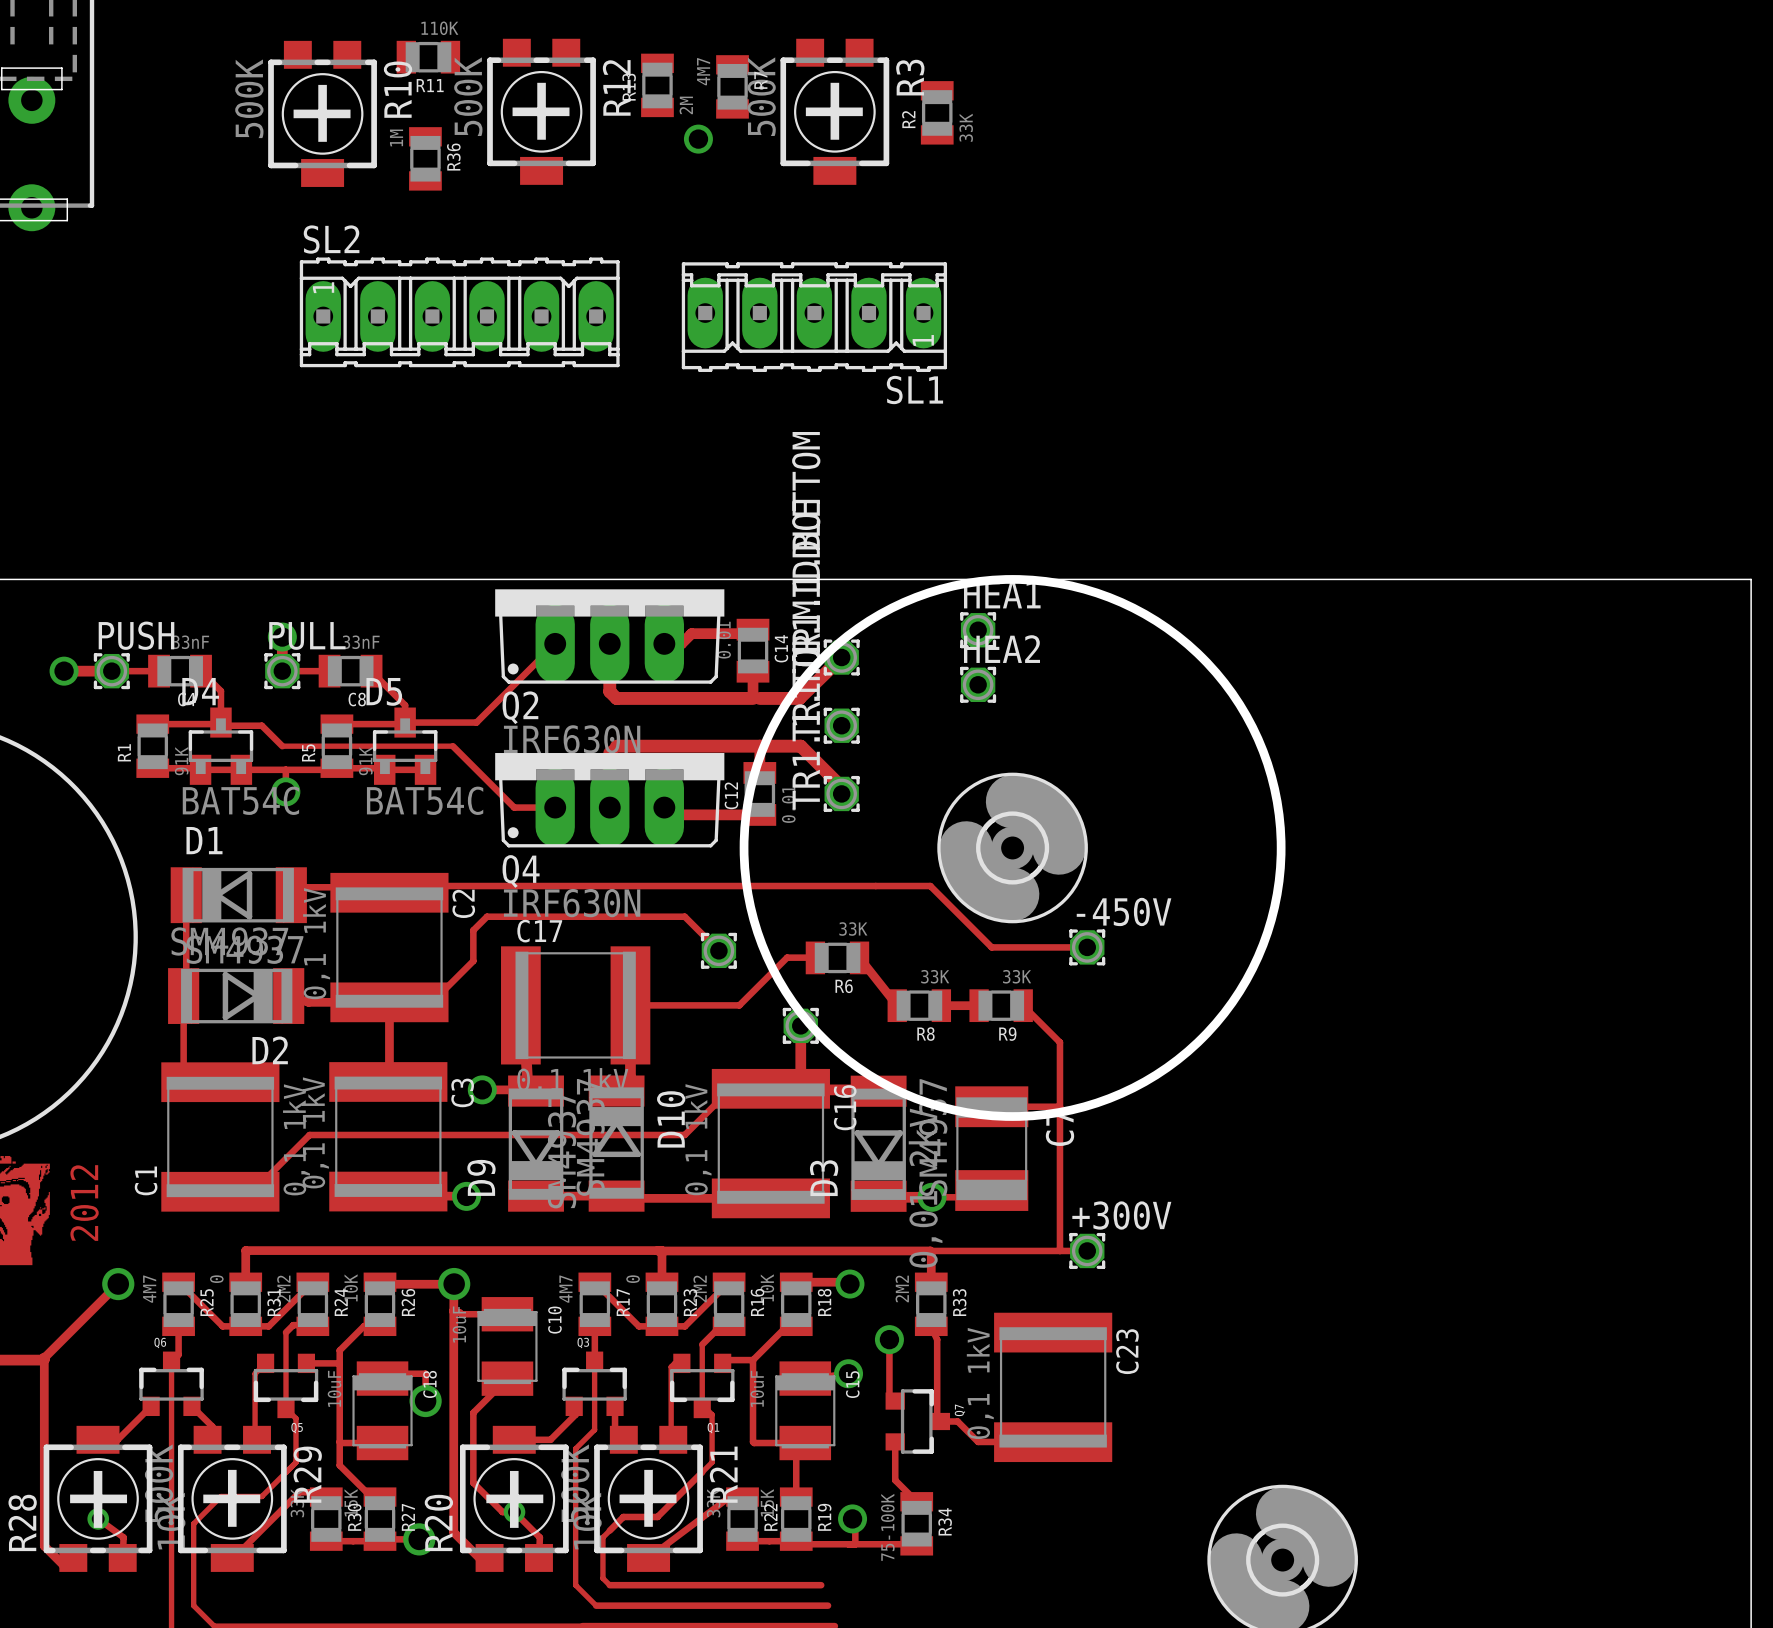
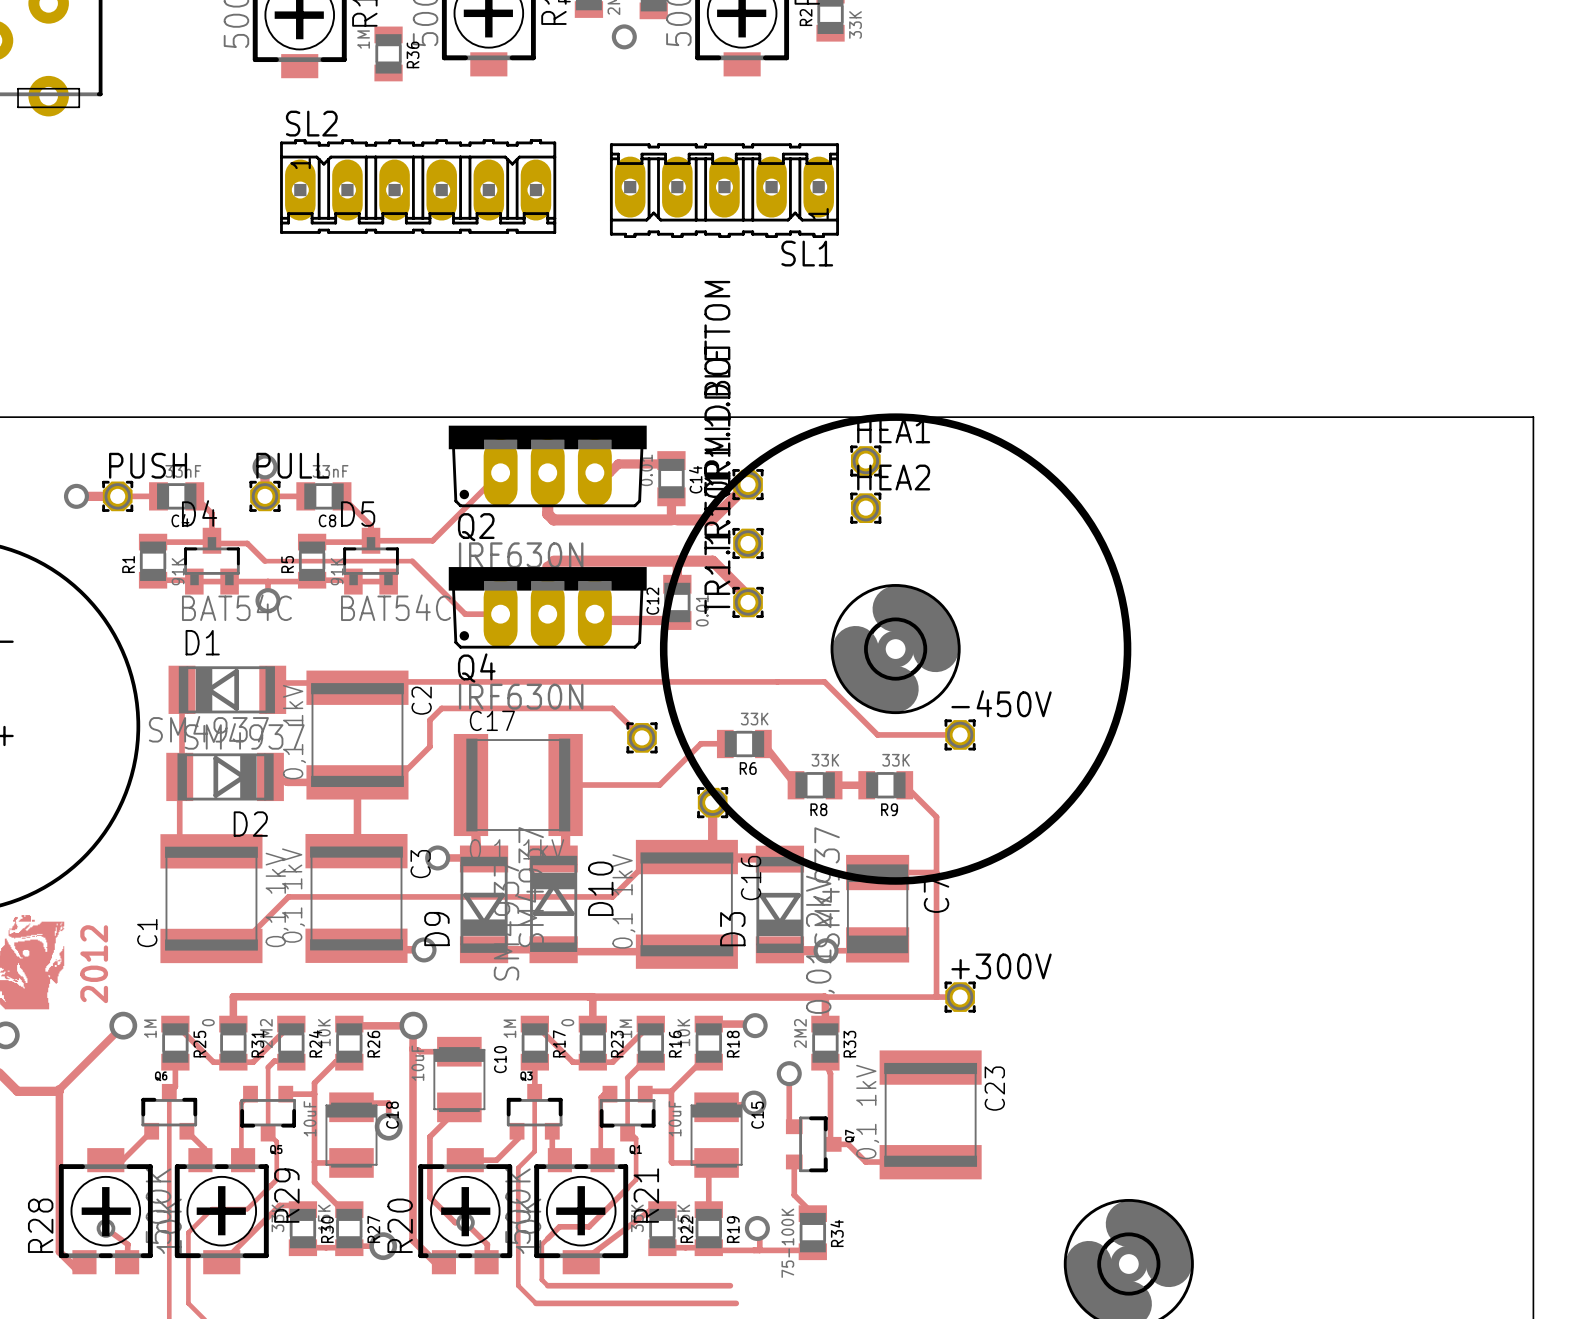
R16 value: 2M2 (700, 1288) -> 1M (625, 1028)
R25 value: 4M7 (149, 1289) -> 1M (150, 1028)
R17 value: 4M7 (565, 1289) -> 1M (509, 1028)

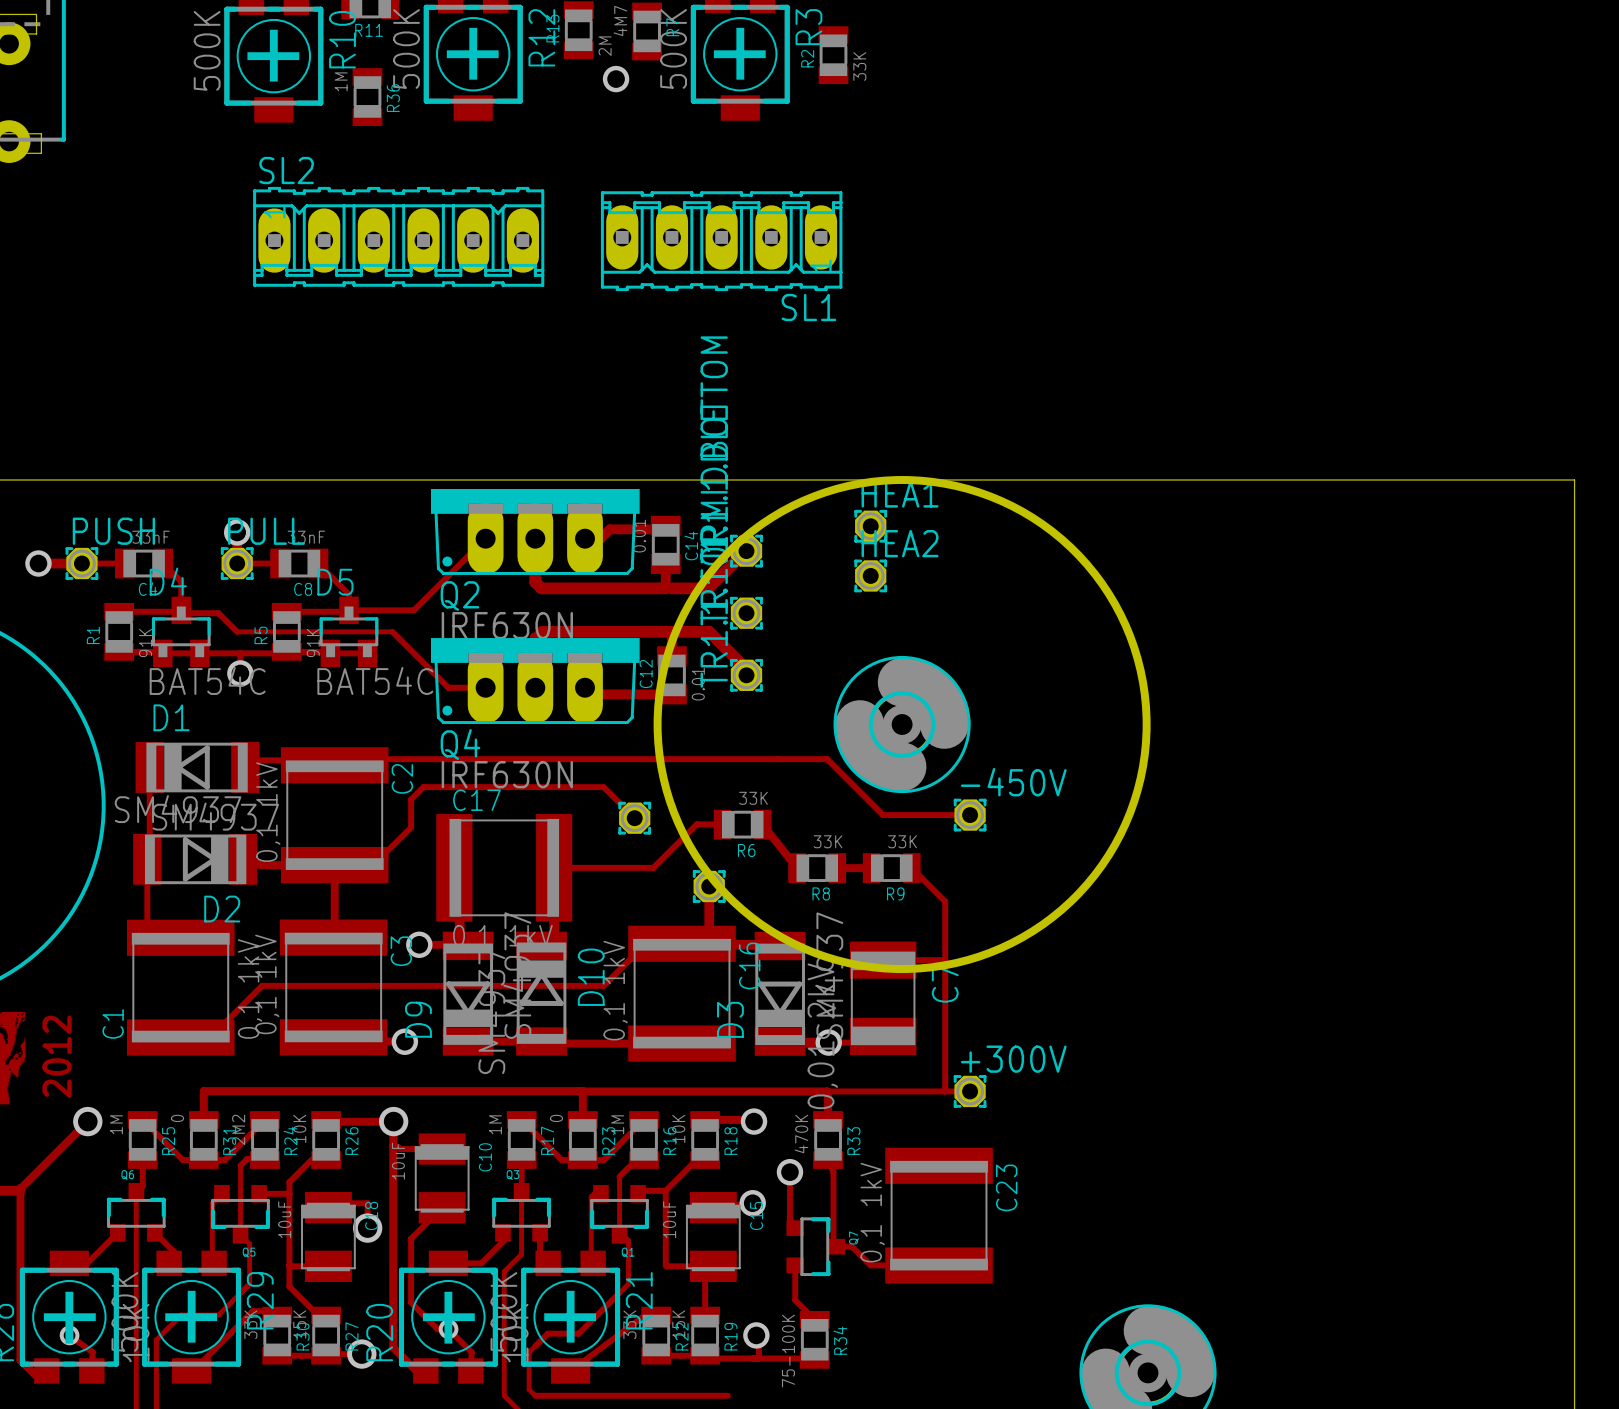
R33 value: 2M2 (800, 1033) -> 470K (801, 1134)

